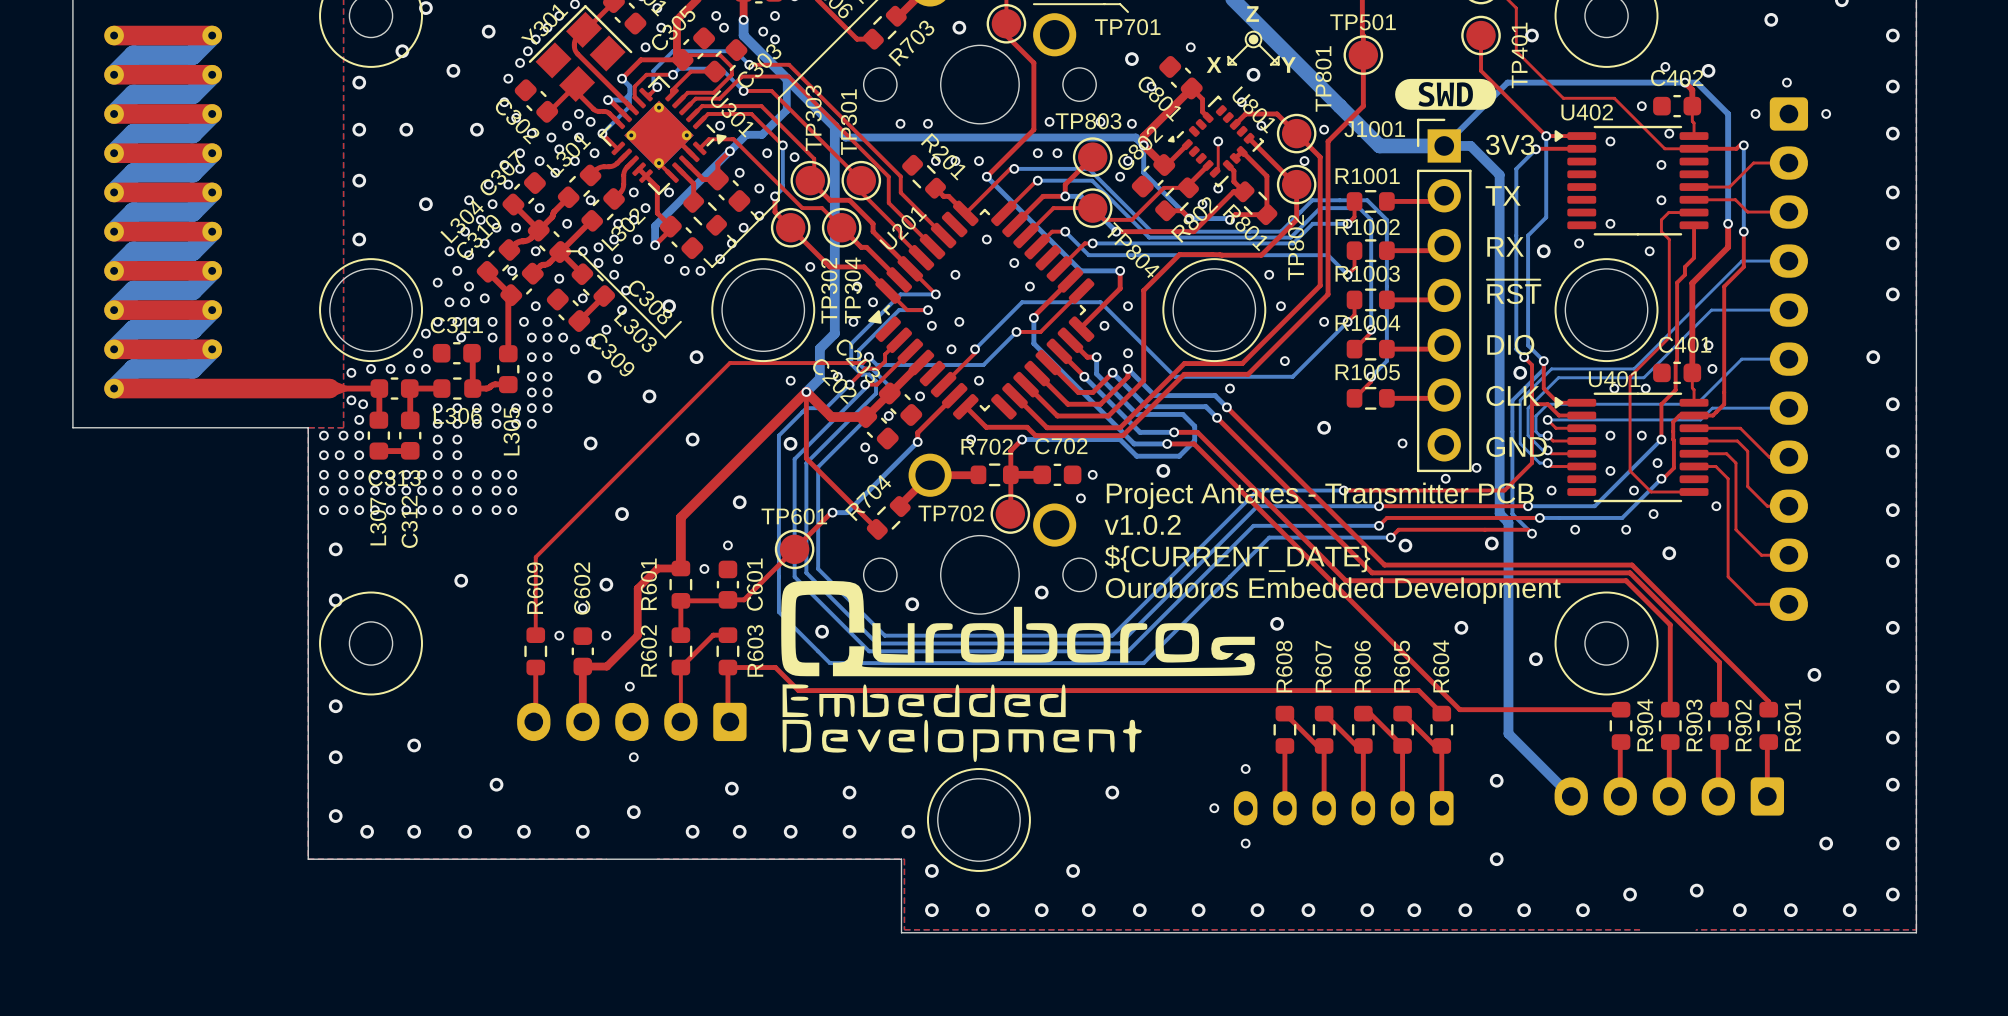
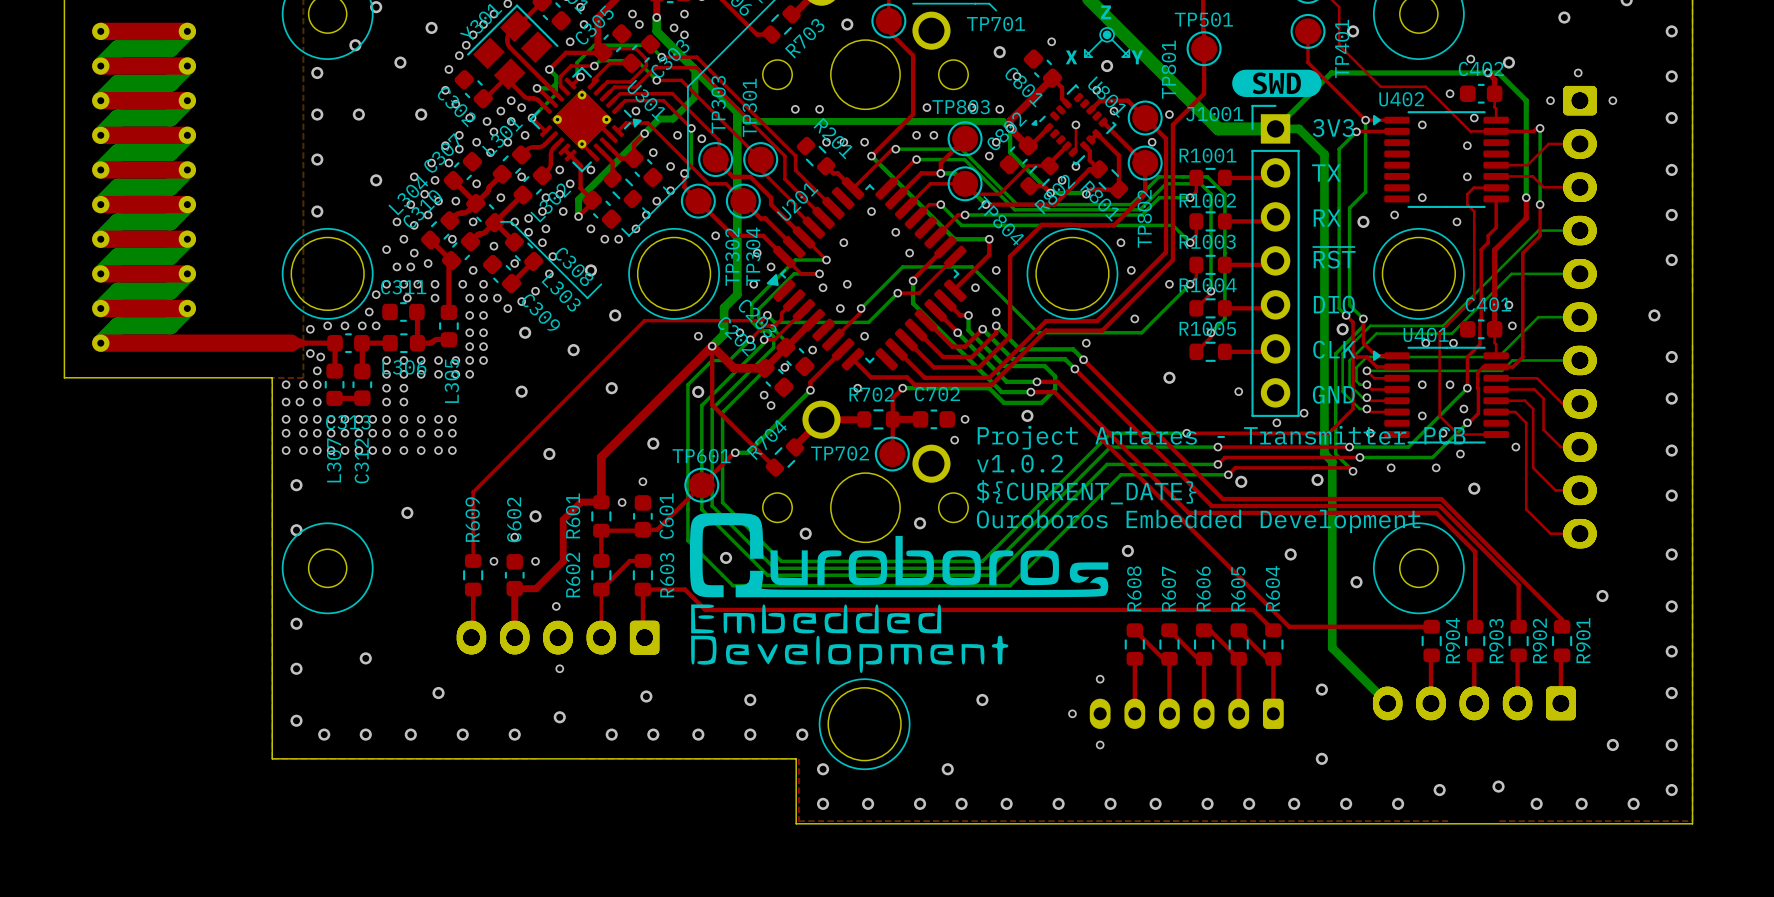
part: none -> (1579, 317)
part: none -> (558, 637)
part: none -> (1474, 703)

